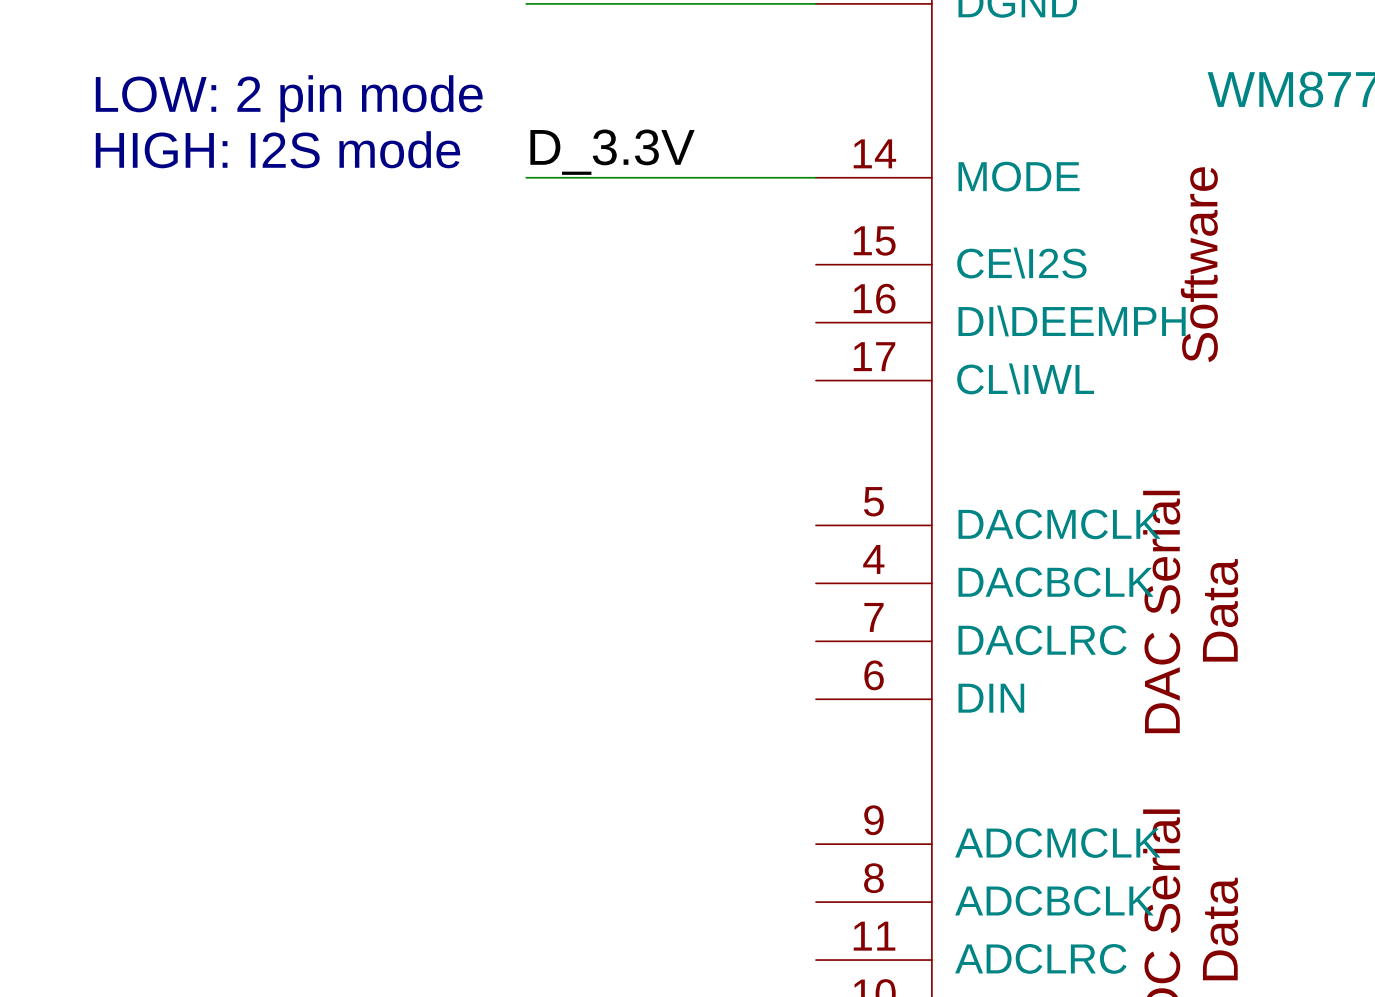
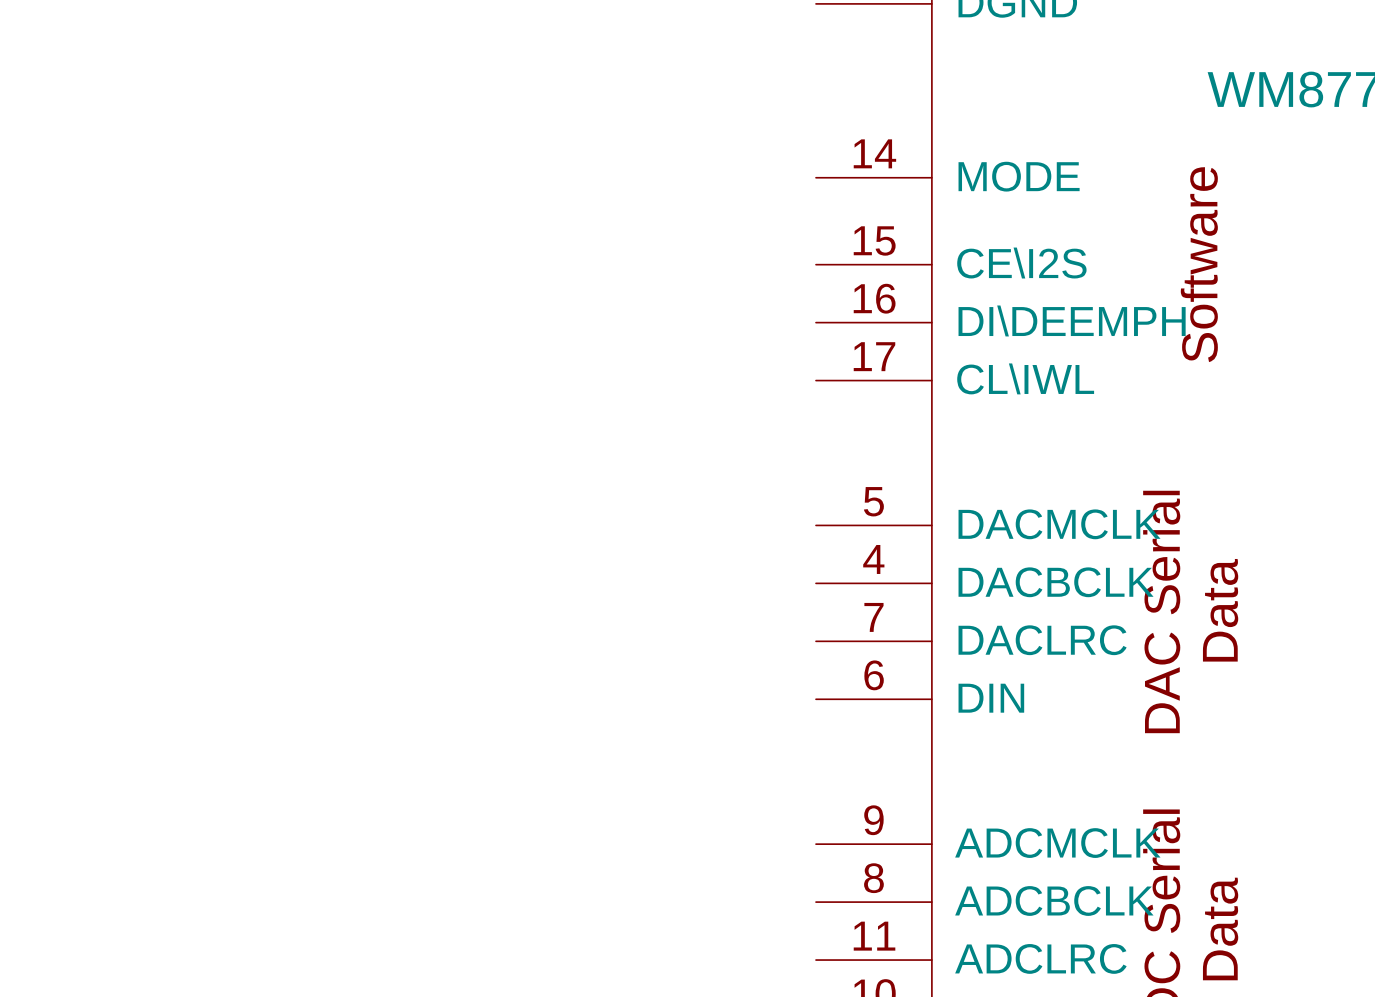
wire: (526, 3) (816, 3) -> none
text: LOW: 2 pin mode (289, 98) -> none
text: HIGH: I2S mode (277, 149) -> none
label: D_3.3V (612, 152) -> none
wire: (526, 177) (816, 177) -> none

